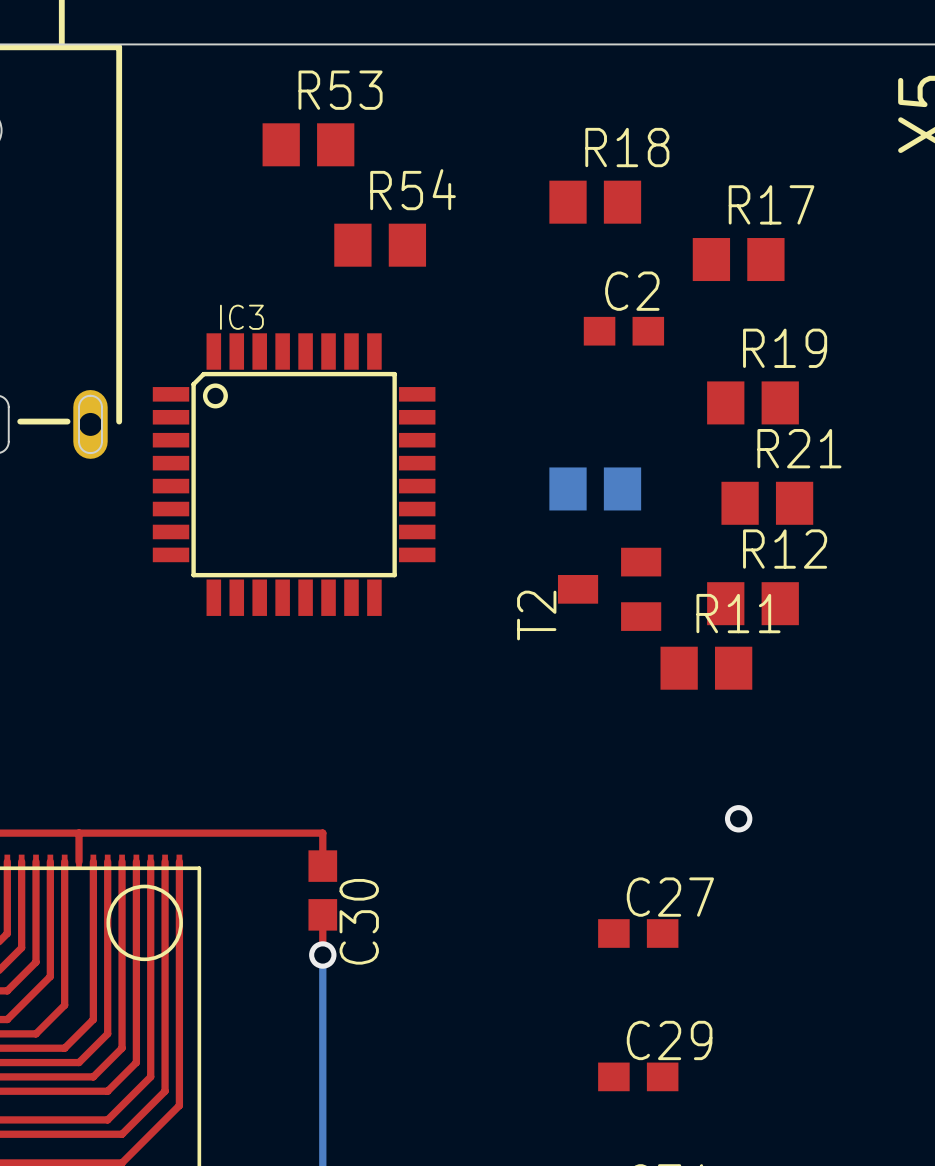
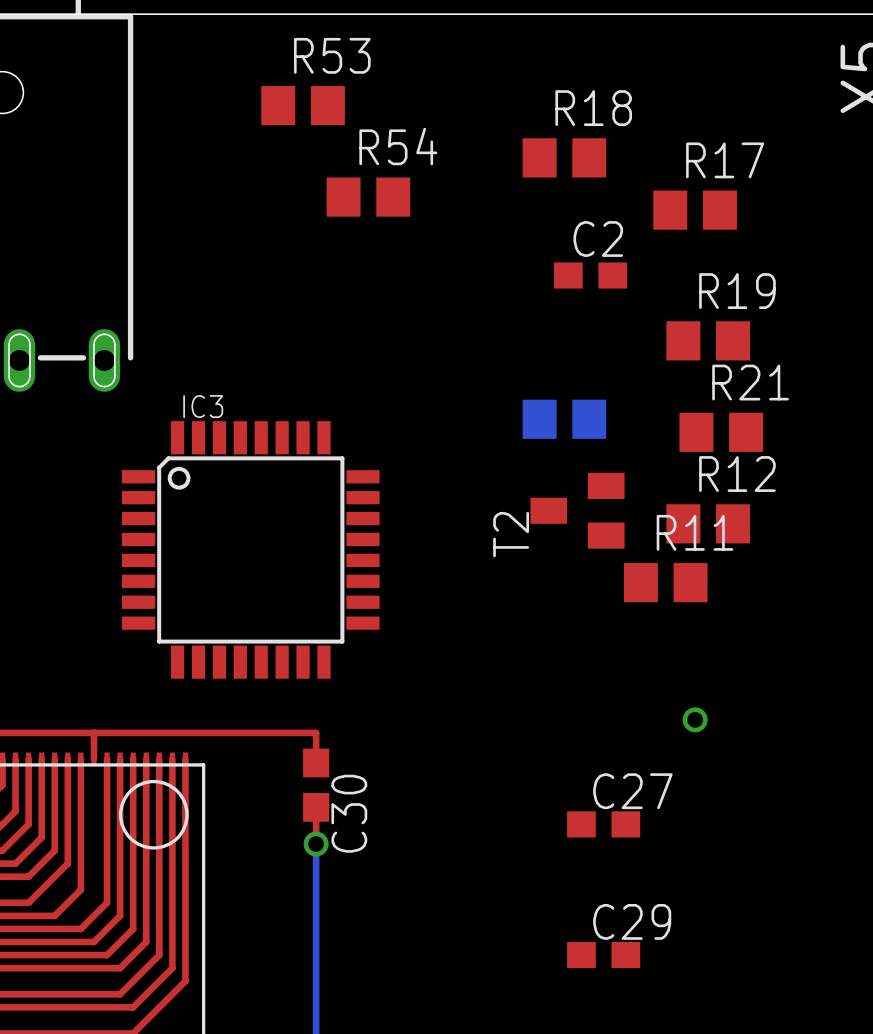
IC3 position: (294, 474) -> (250, 549)

